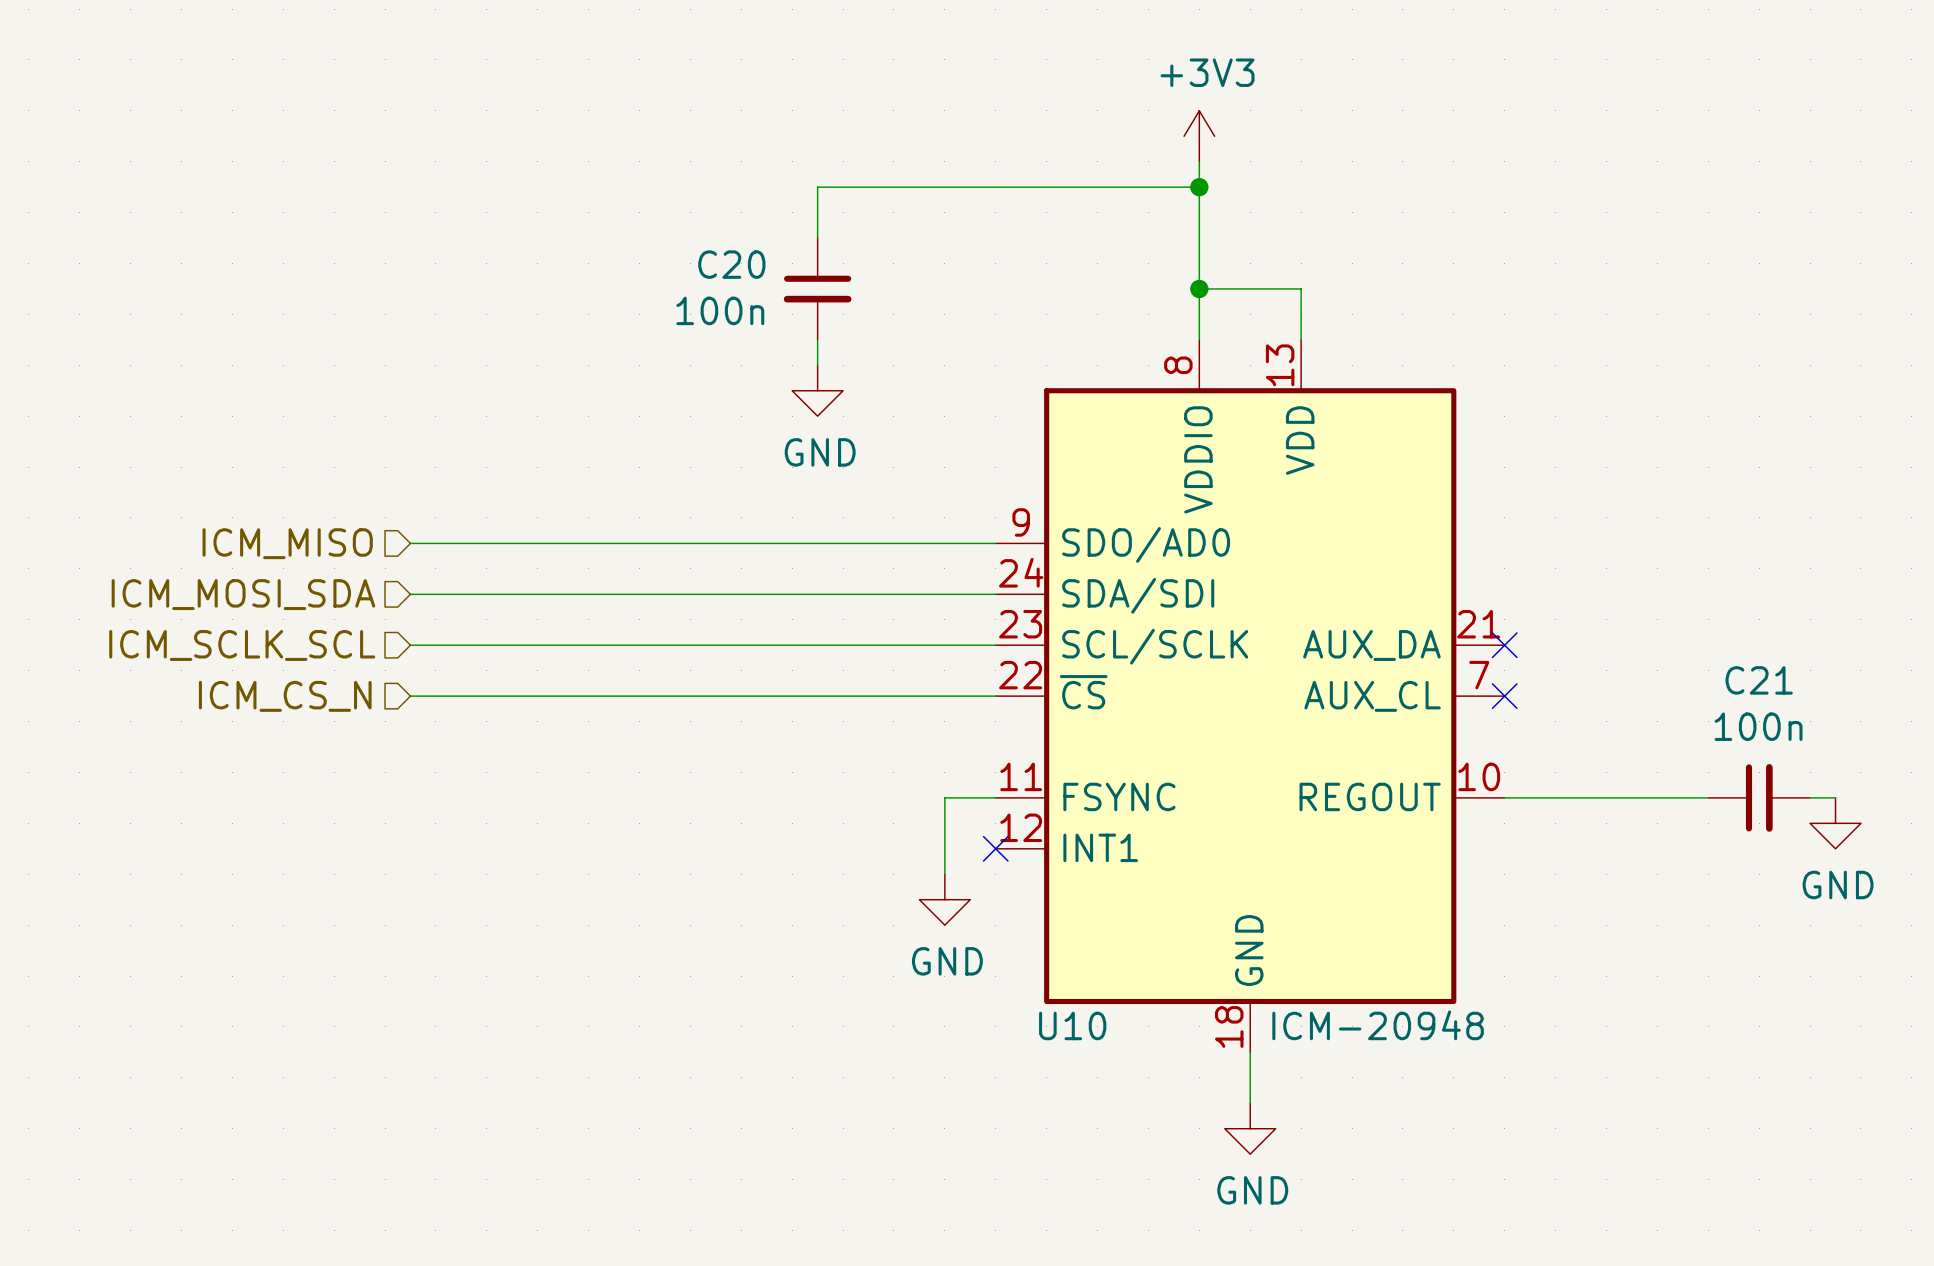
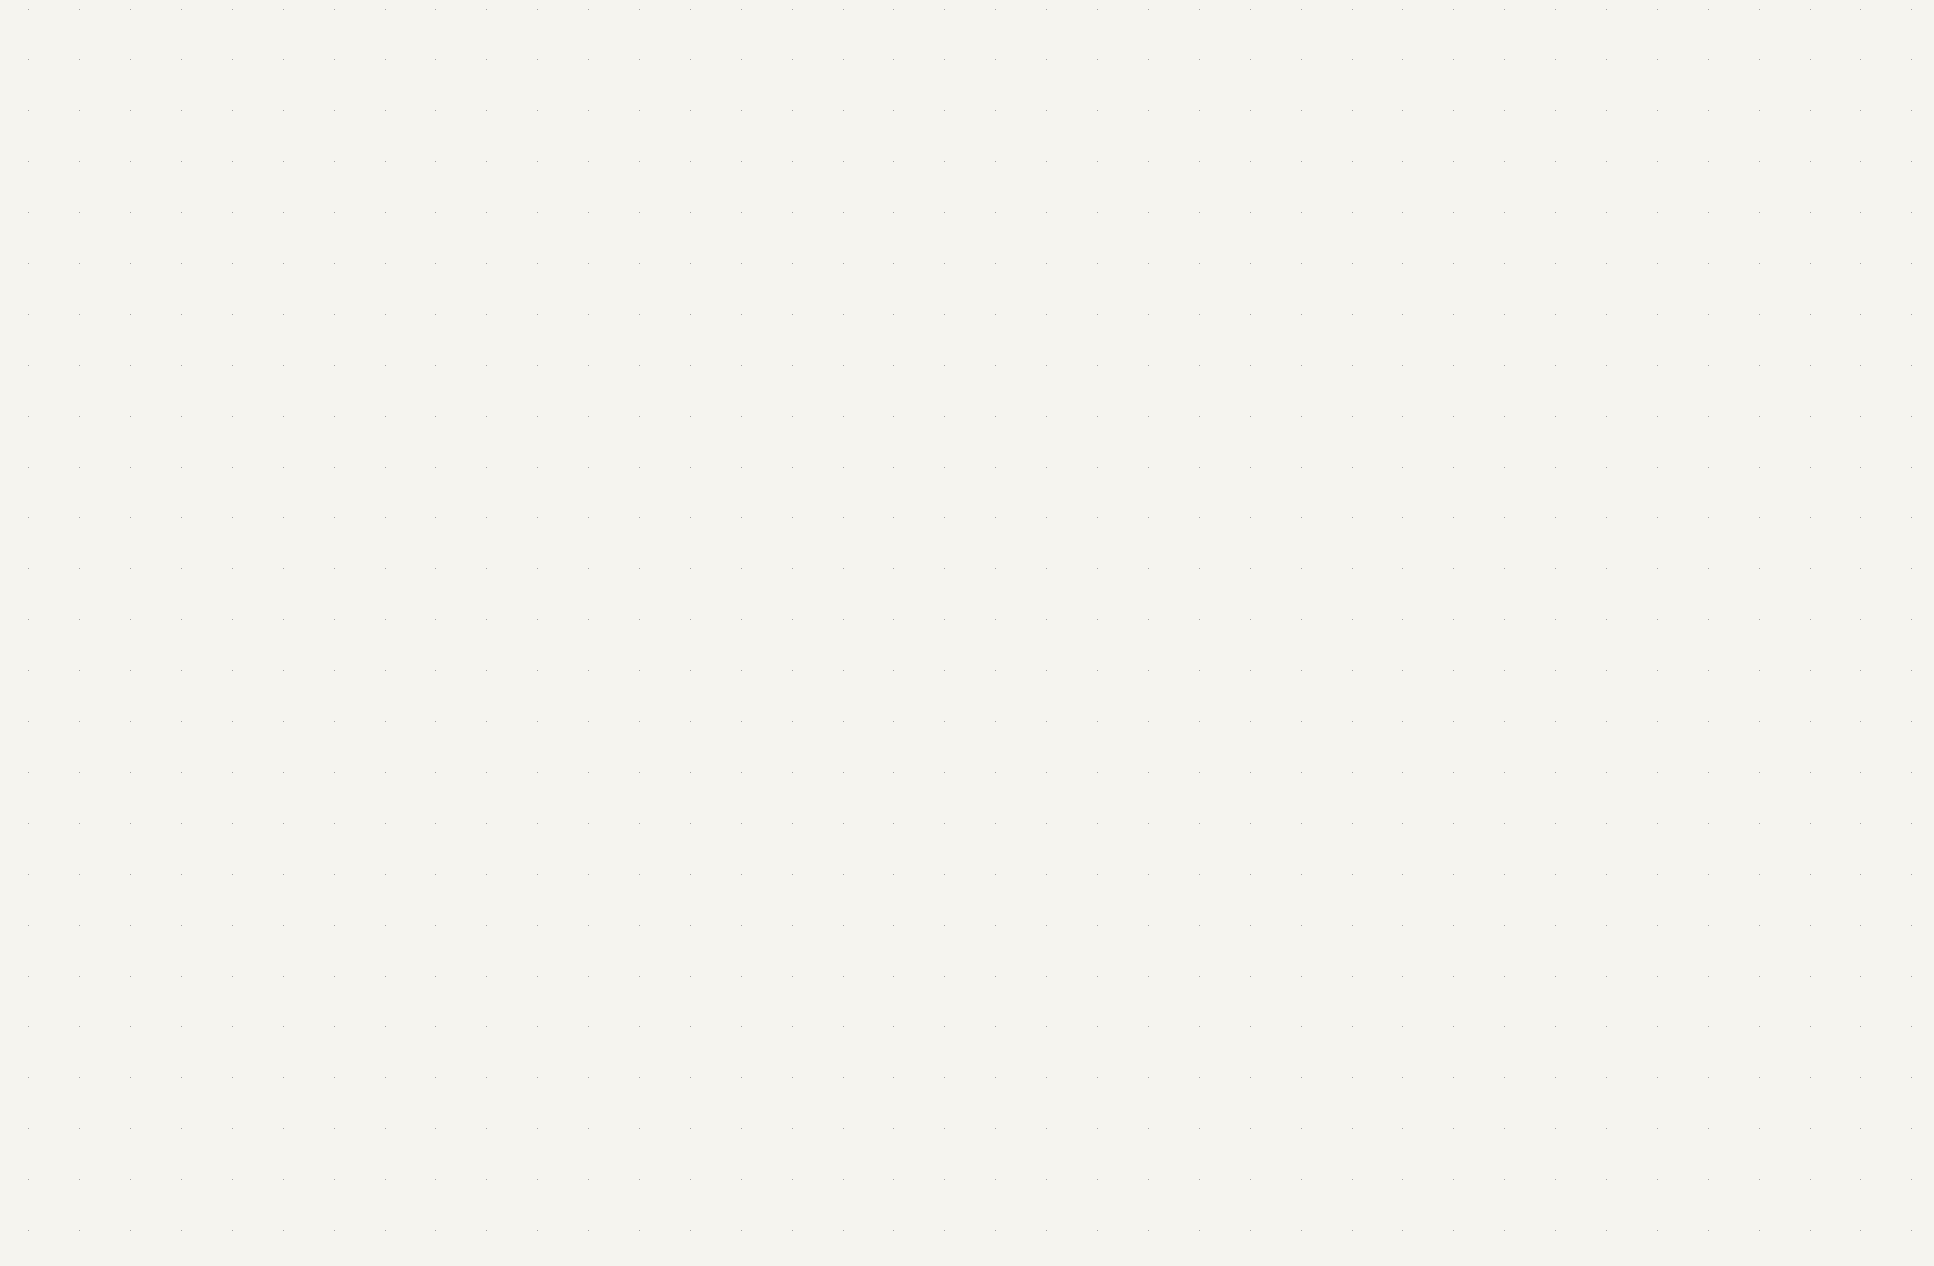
power symbol: +3V3 (1199, 136) -> none
wire: (1199, 161) (1199, 339) -> none
wire: (1199, 187) (817, 187) (817, 238) -> none
junction: (1199, 187) -> none
C20: 100n (817, 288) -> none
wire: (1199, 288) (1301, 288) (1301, 339) -> none
junction: (1199, 288) -> none
wire: (817, 339) (817, 365) -> none
power symbol: GND (817, 390) -> none
hierarchical label: ICM_MISO (287, 543) -> none
wire: (410, 543) (995, 543) -> none
hierarchical label: ICM_MOSI_SDA (243, 594) -> none
wire: (410, 594) (995, 594) -> none
hierarchical label: ICM_SCLK_SCL (242, 645) -> none
wire: (410, 645) (995, 645) -> none
no-connect mark: (1504, 645) -> none
hierarchical label: ICM_CS_N (285, 696) -> none
wire: (410, 696) (995, 696) -> none
U10: ICM-20948 (1250, 696) -> none
no-connect mark: (1504, 696) -> none
wire: (995, 797) (944, 797) (944, 874) -> none
wire: (1504, 797) (1708, 797) -> none
C21: 100n (1759, 797) -> none
wire: (1810, 797) (1835, 797) -> none
power symbol: GND (1835, 823) -> none
no-connect mark: (995, 848) -> none
power symbol: GND (944, 899) -> none
wire: (1250, 1052) (1250, 1103) -> none
power symbol: GND (1250, 1128) -> none

